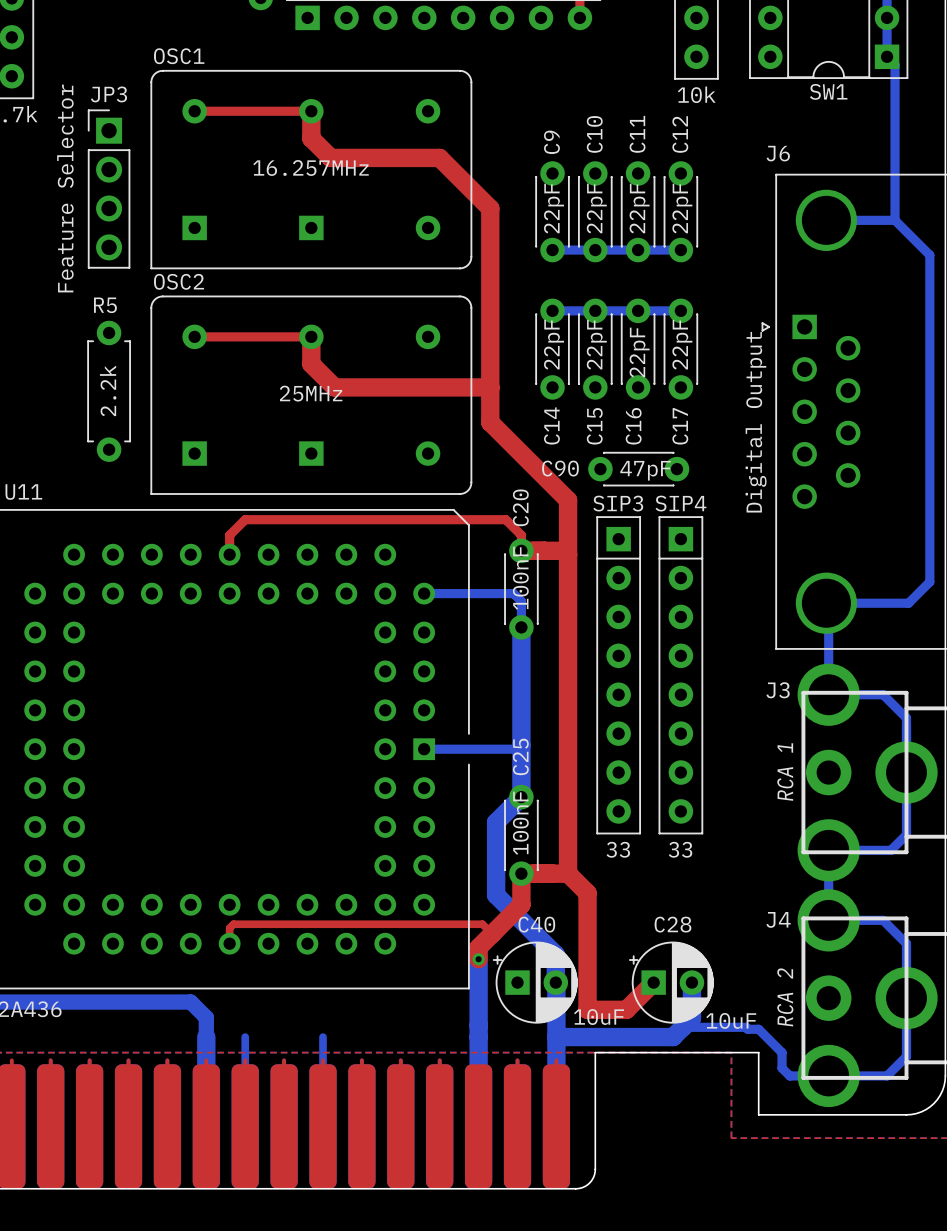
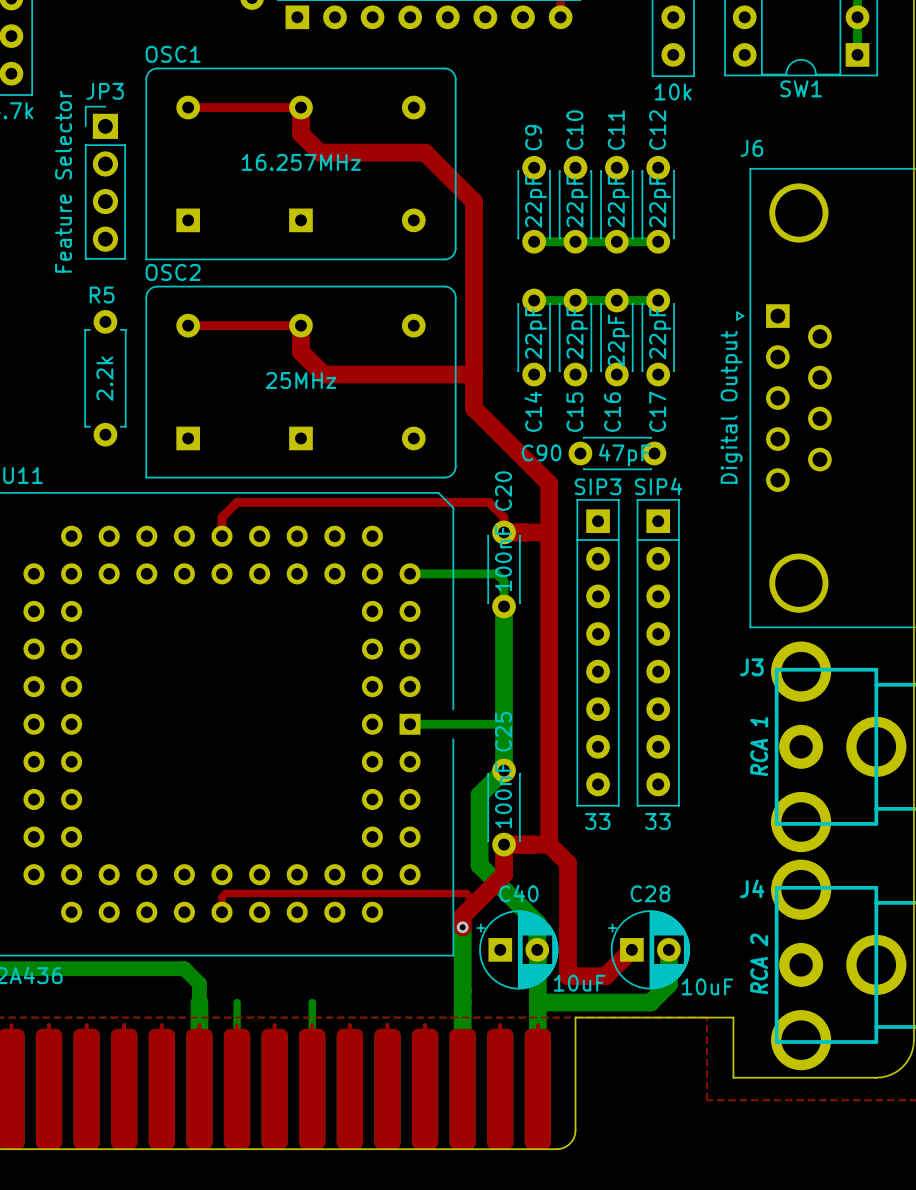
bottom track: (887, 56) (895, 64) (895, 220) -> none
bottom track: (826, 220) (895, 220) -> none
bottom track: (895, 220) (929, 255) (929, 581) (908, 603) (826, 603) (828, 605) (828, 694) (883, 694) (906, 718) (906, 834) (890, 850) (828, 850) (828, 920) (883, 920) (906, 943) (906, 1056) (887, 1075) (789, 1075) (782, 1068) (782, 1052) (758, 1029) (747, 1029) (745, 1027) (682, 1027) -> none

